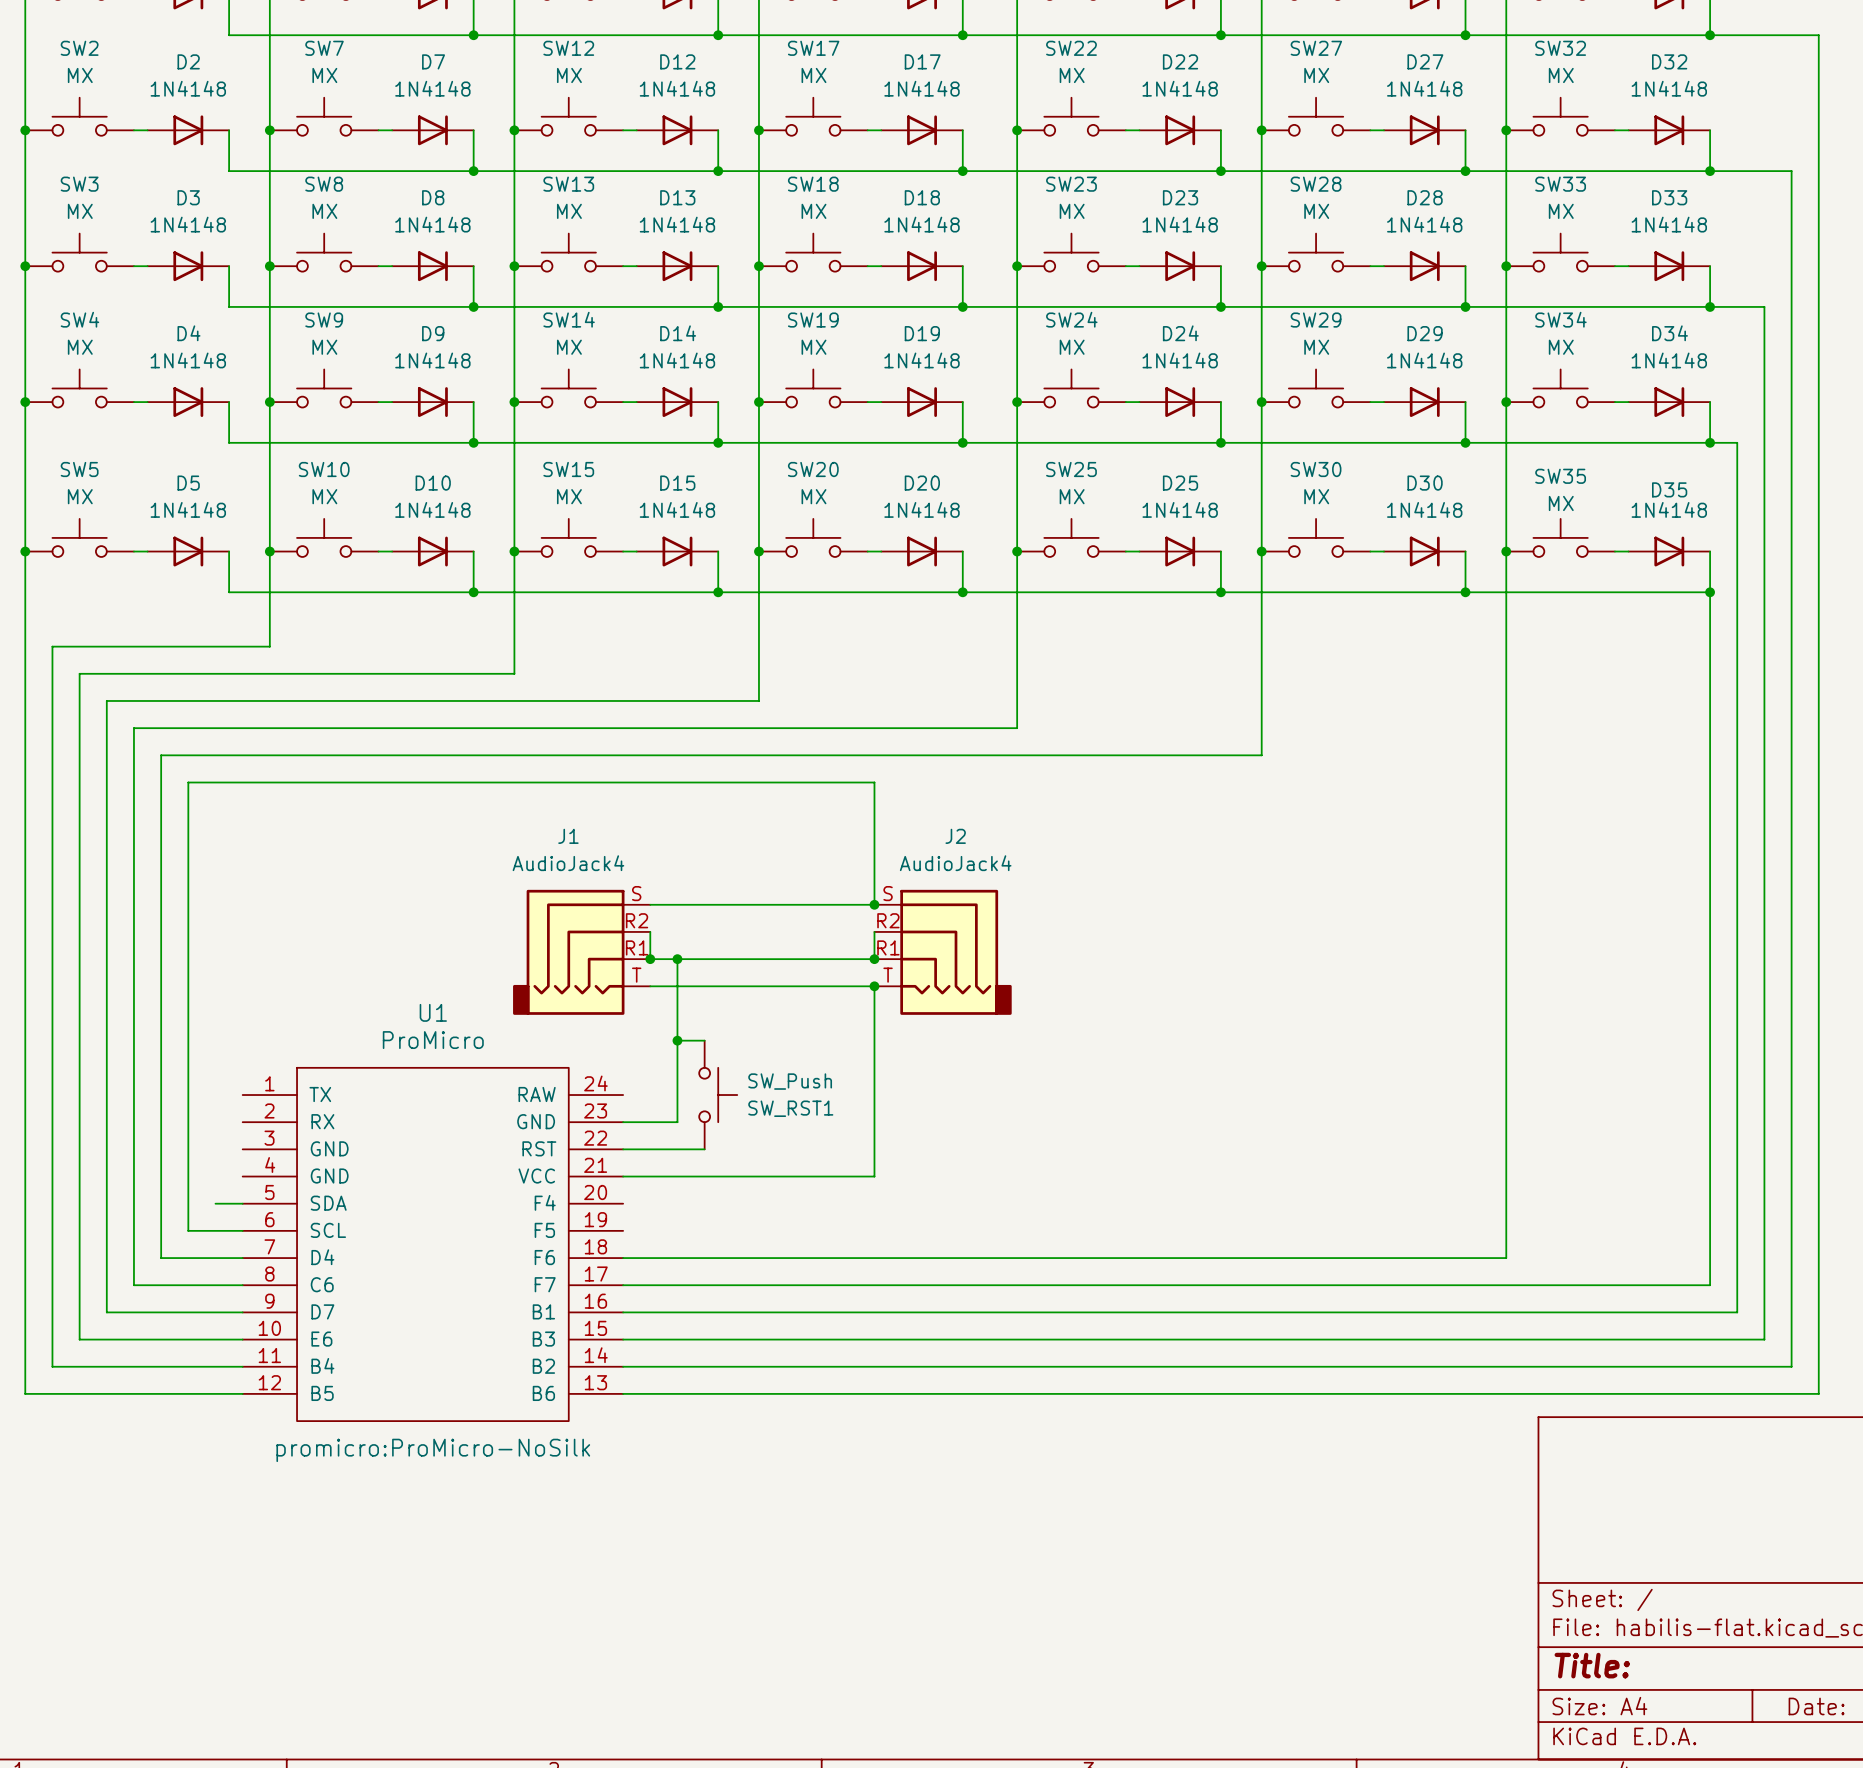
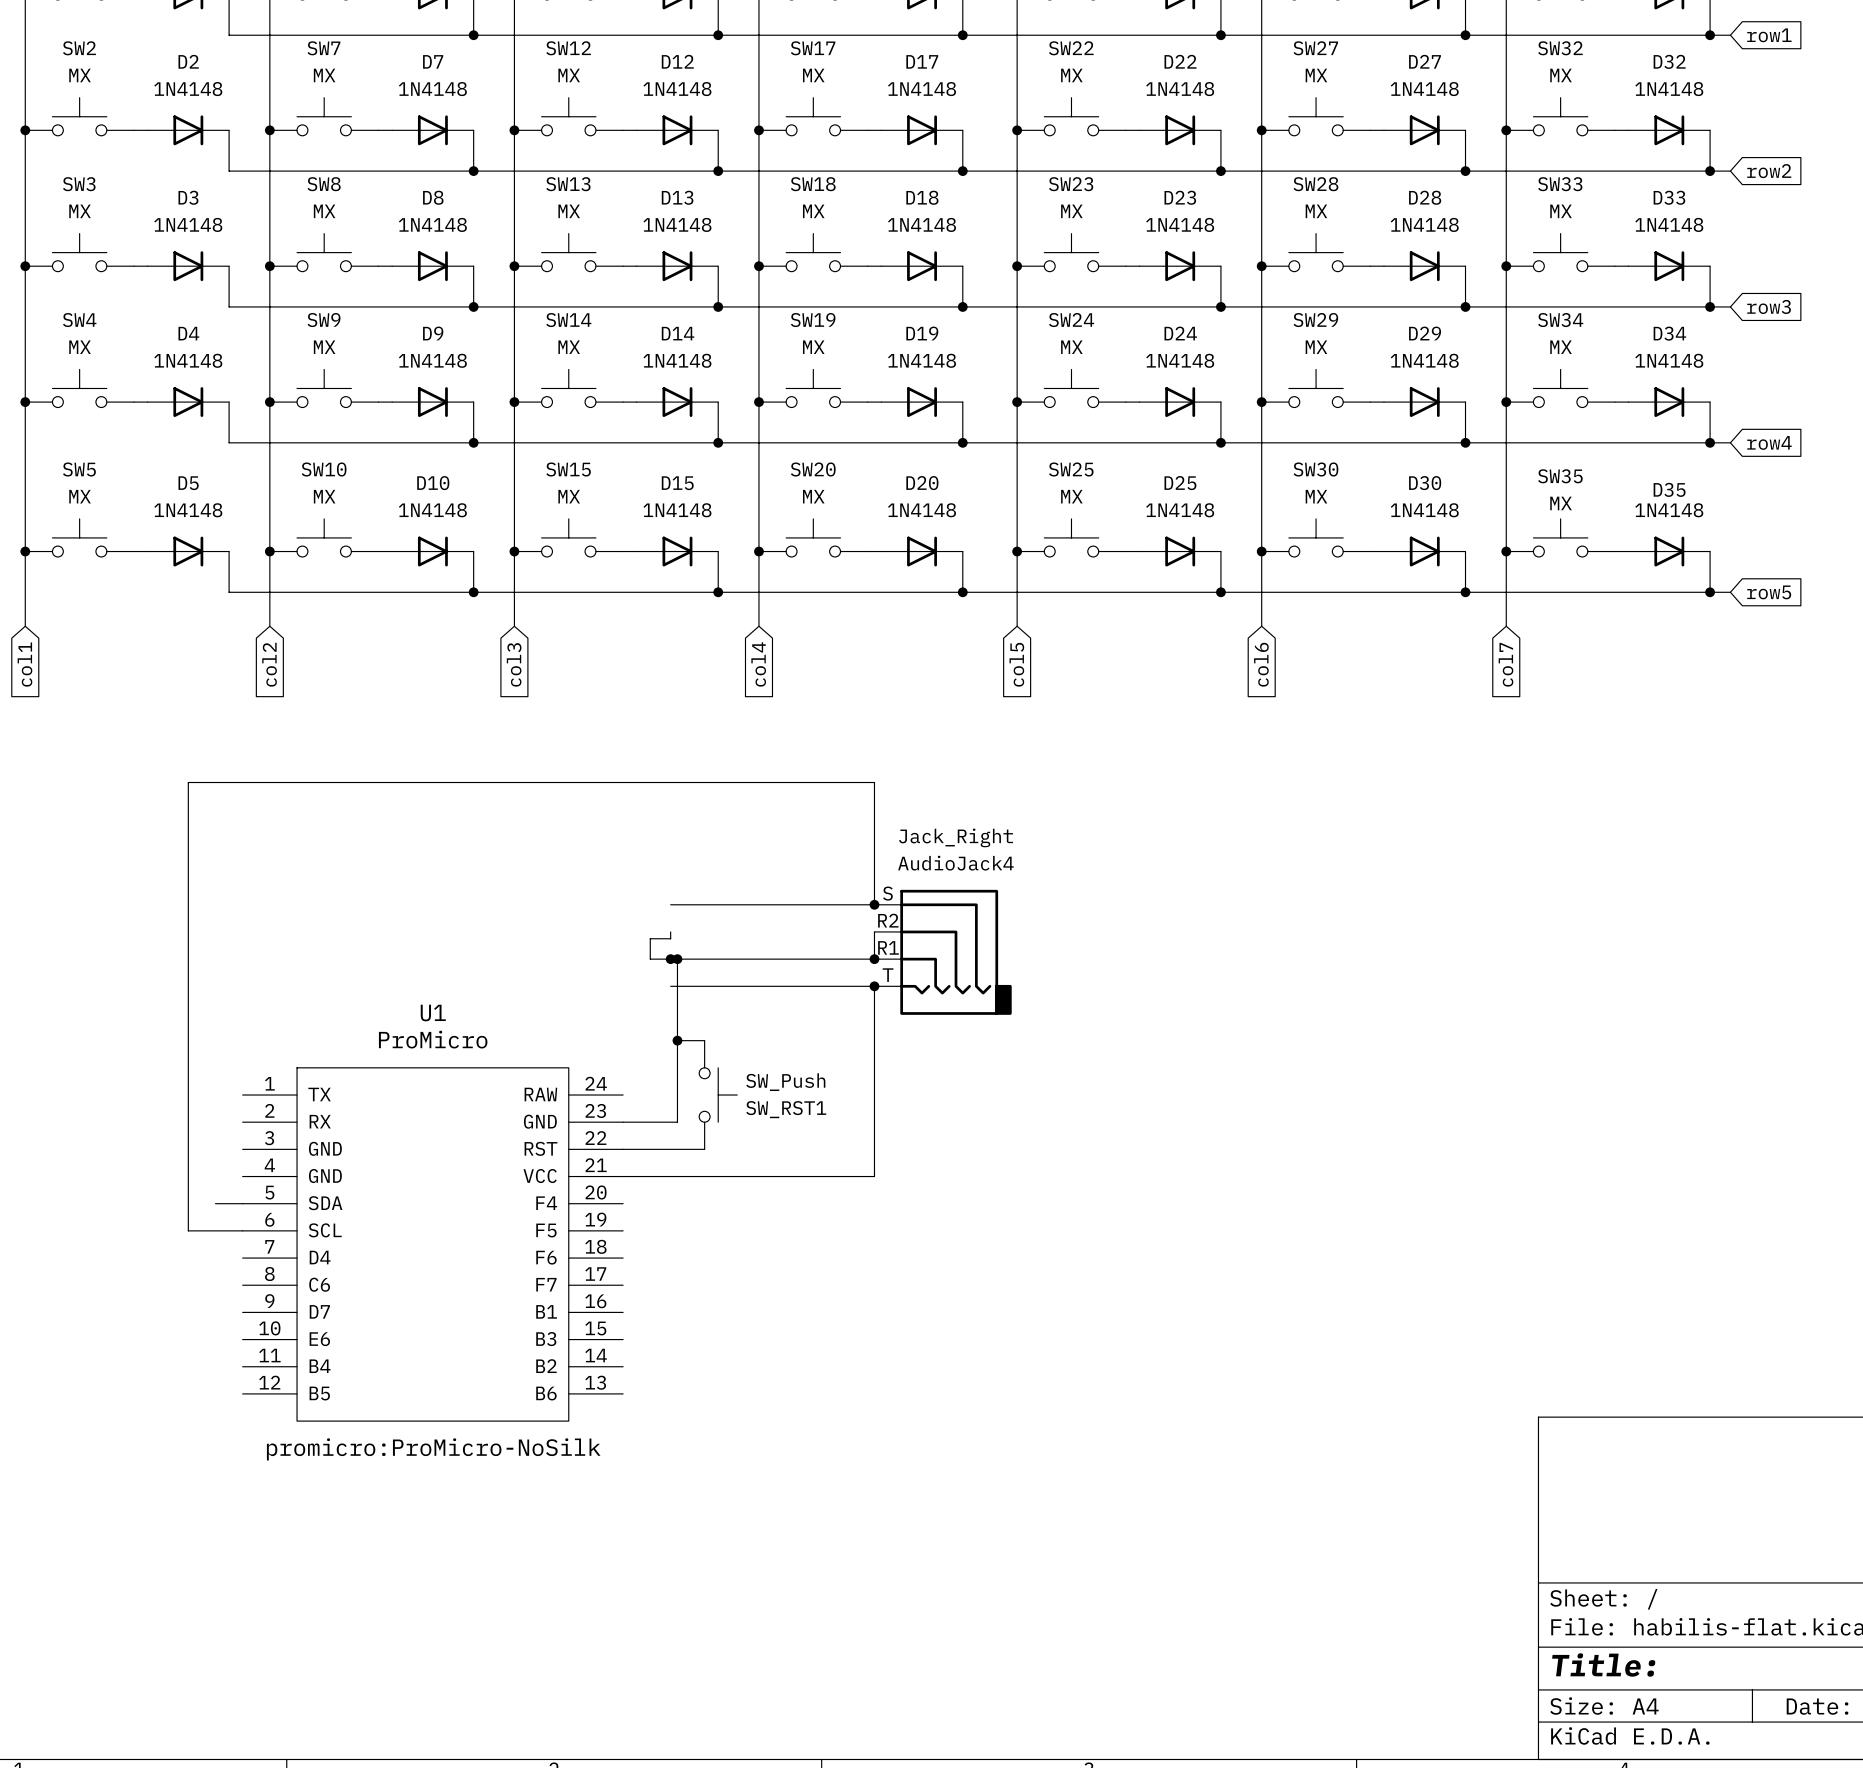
wire: (1730, 35) (1818, 35) (1818, 1393) (623, 1393) -> none
global label: none -> row1 (1769, 35)
wire: (1730, 171) (1791, 171) (1791, 1366) (623, 1366) -> none
global label: none -> row2 (1769, 171)
wire: (1730, 306) (1764, 306) (1764, 1339) (623, 1339) -> none
global label: none -> row3 (1769, 306)
wire: (1730, 442) (1737, 442) (1737, 1312) (623, 1312) -> none
global label: none -> row4 (1769, 442)
wire: (1710, 592) (1710, 1285) (623, 1285) -> (1710, 592) (1730, 592)
global label: none -> row5 (1769, 592)
wire: (25, 626) (25, 1393) (242, 1393) -> none
wire: (269, 626) (269, 646) (52, 646) (52, 1366) (242, 1366) -> none
wire: (514, 626) (514, 673) (79, 673) (79, 1339) (242, 1339) -> none
wire: (758, 626) (758, 700) (106, 700) (106, 1312) (242, 1312) -> none
wire: (1017, 626) (1017, 728) (133, 728) (133, 1285) (242, 1285) -> none
wire: (1261, 626) (1261, 755) (161, 755) (161, 1258) (242, 1258) -> none
wire: (1506, 626) (1506, 1258) (623, 1258) -> none
global label: none -> col1 (24, 664)
global label: none -> col2 (269, 664)
global label: none -> col3 (514, 664)
global label: none -> col4 (758, 664)
global label: none -> col5 (1016, 664)
global label: none -> col6 (1261, 664)
global label: none -> col7 (1505, 664)
J2 name: J2 (955, 836) -> Jack_Right (955, 837)
wire: (650, 904) (670, 904) -> none
wire: (650, 931) (650, 938) -> (670, 931) (670, 938) (650, 938)
J1: AudioJack4 (581, 952) -> none
junction position: (650, 959) -> (670, 959)
wire: (650, 986) (670, 986) -> none

